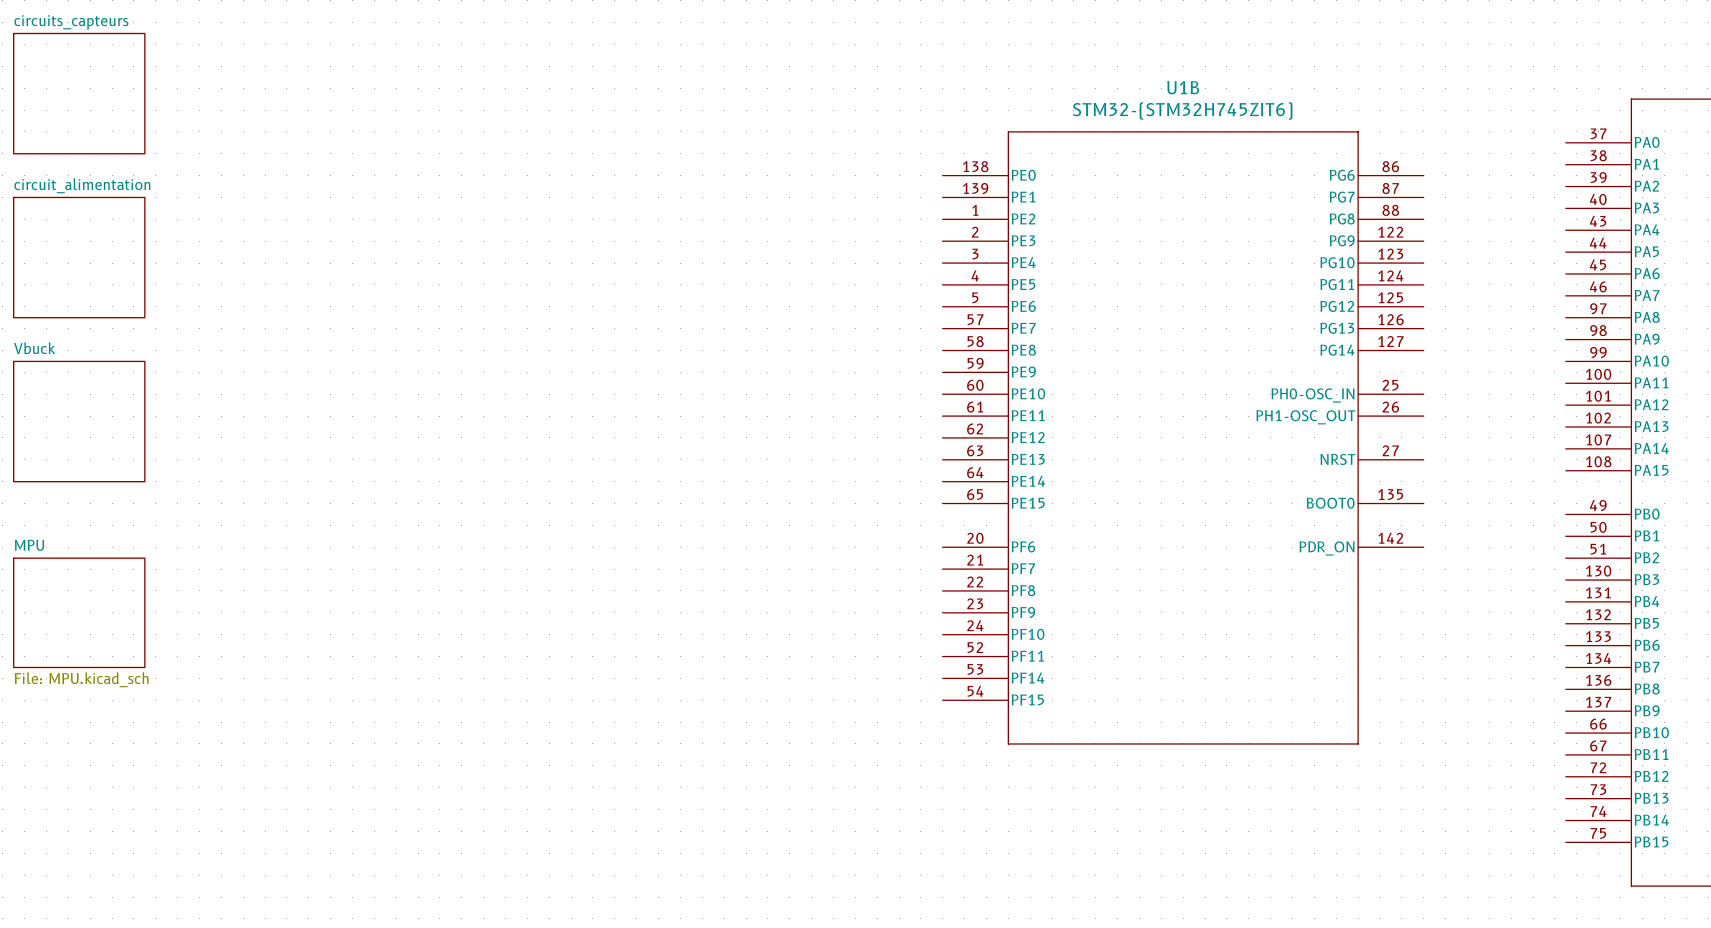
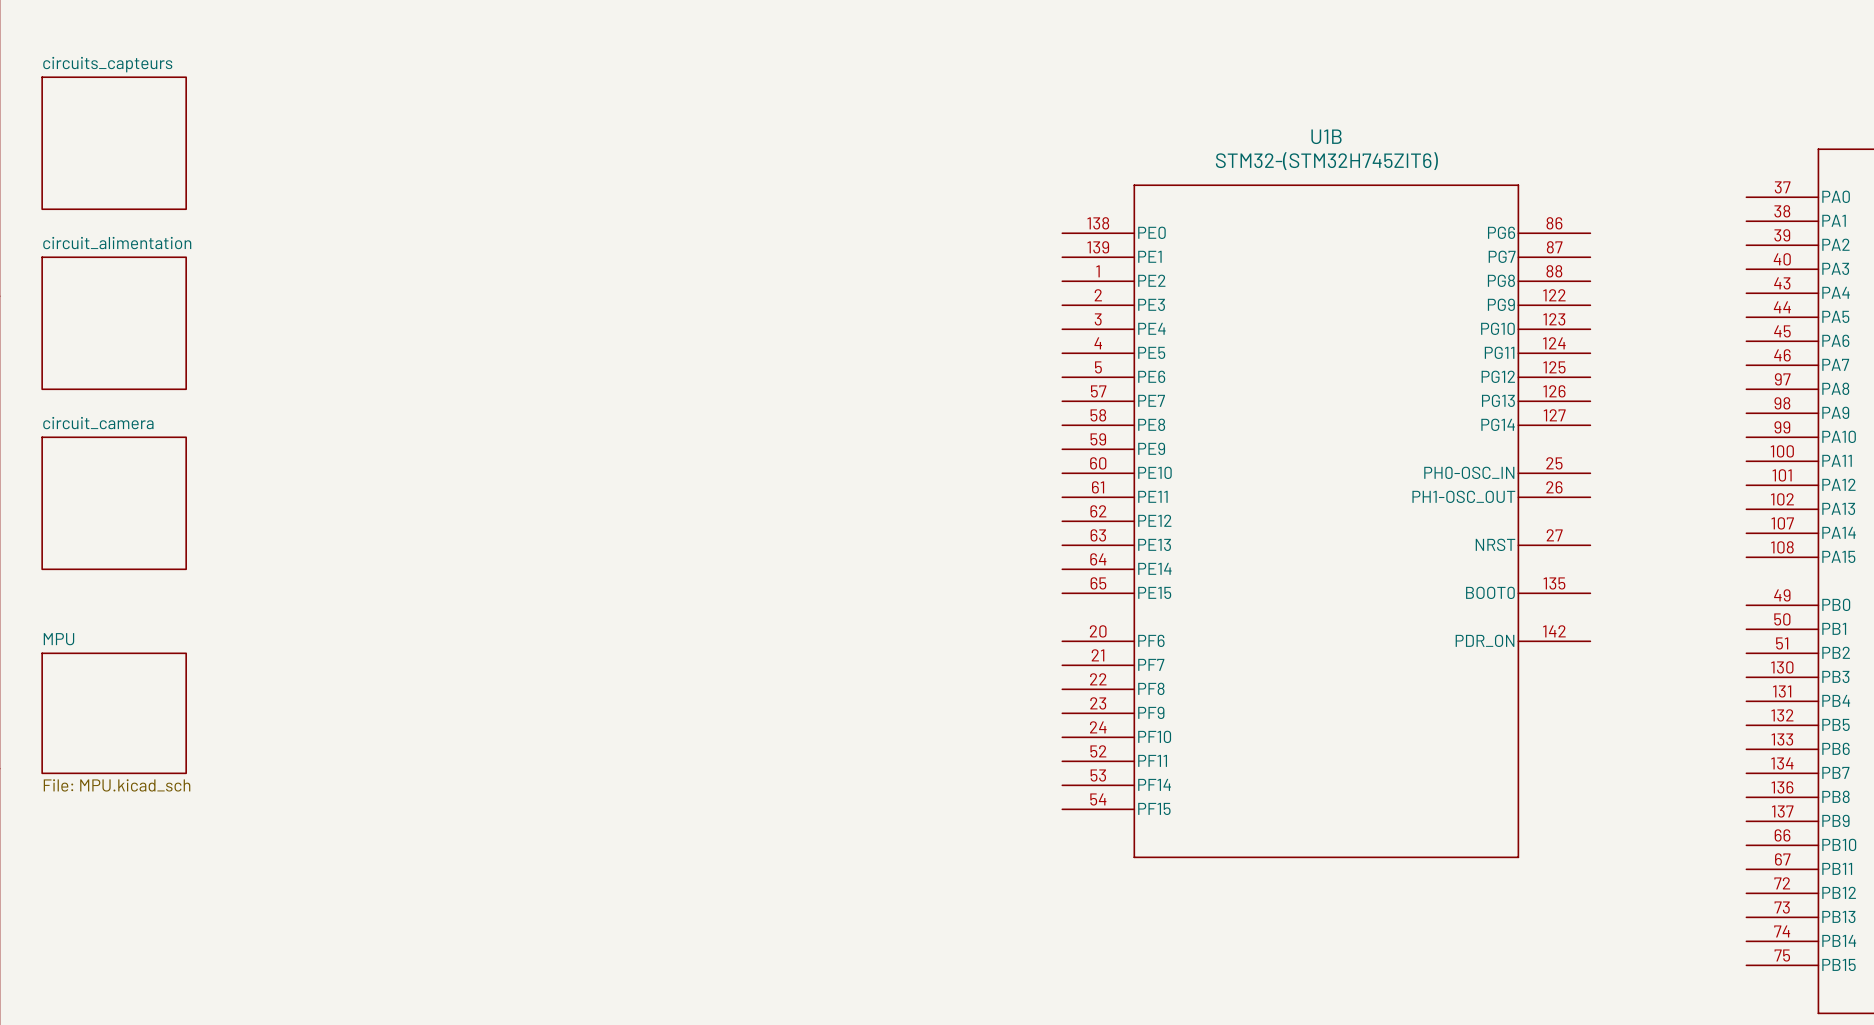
sheet Vbuck name: Vbuck (34, 348) -> circuit_camera (98, 423)

